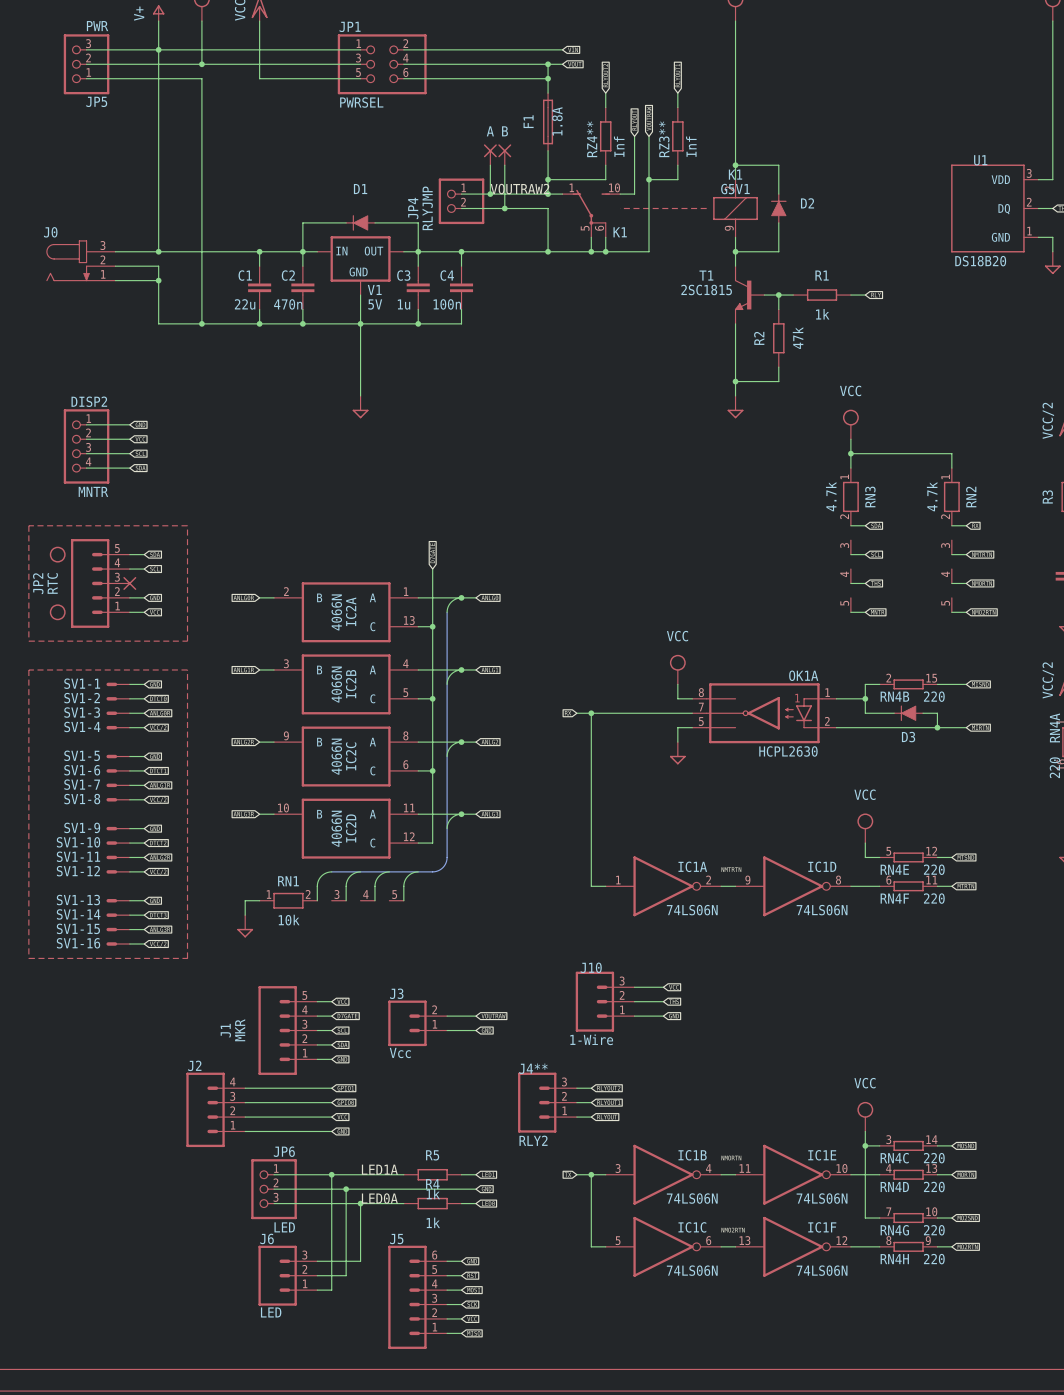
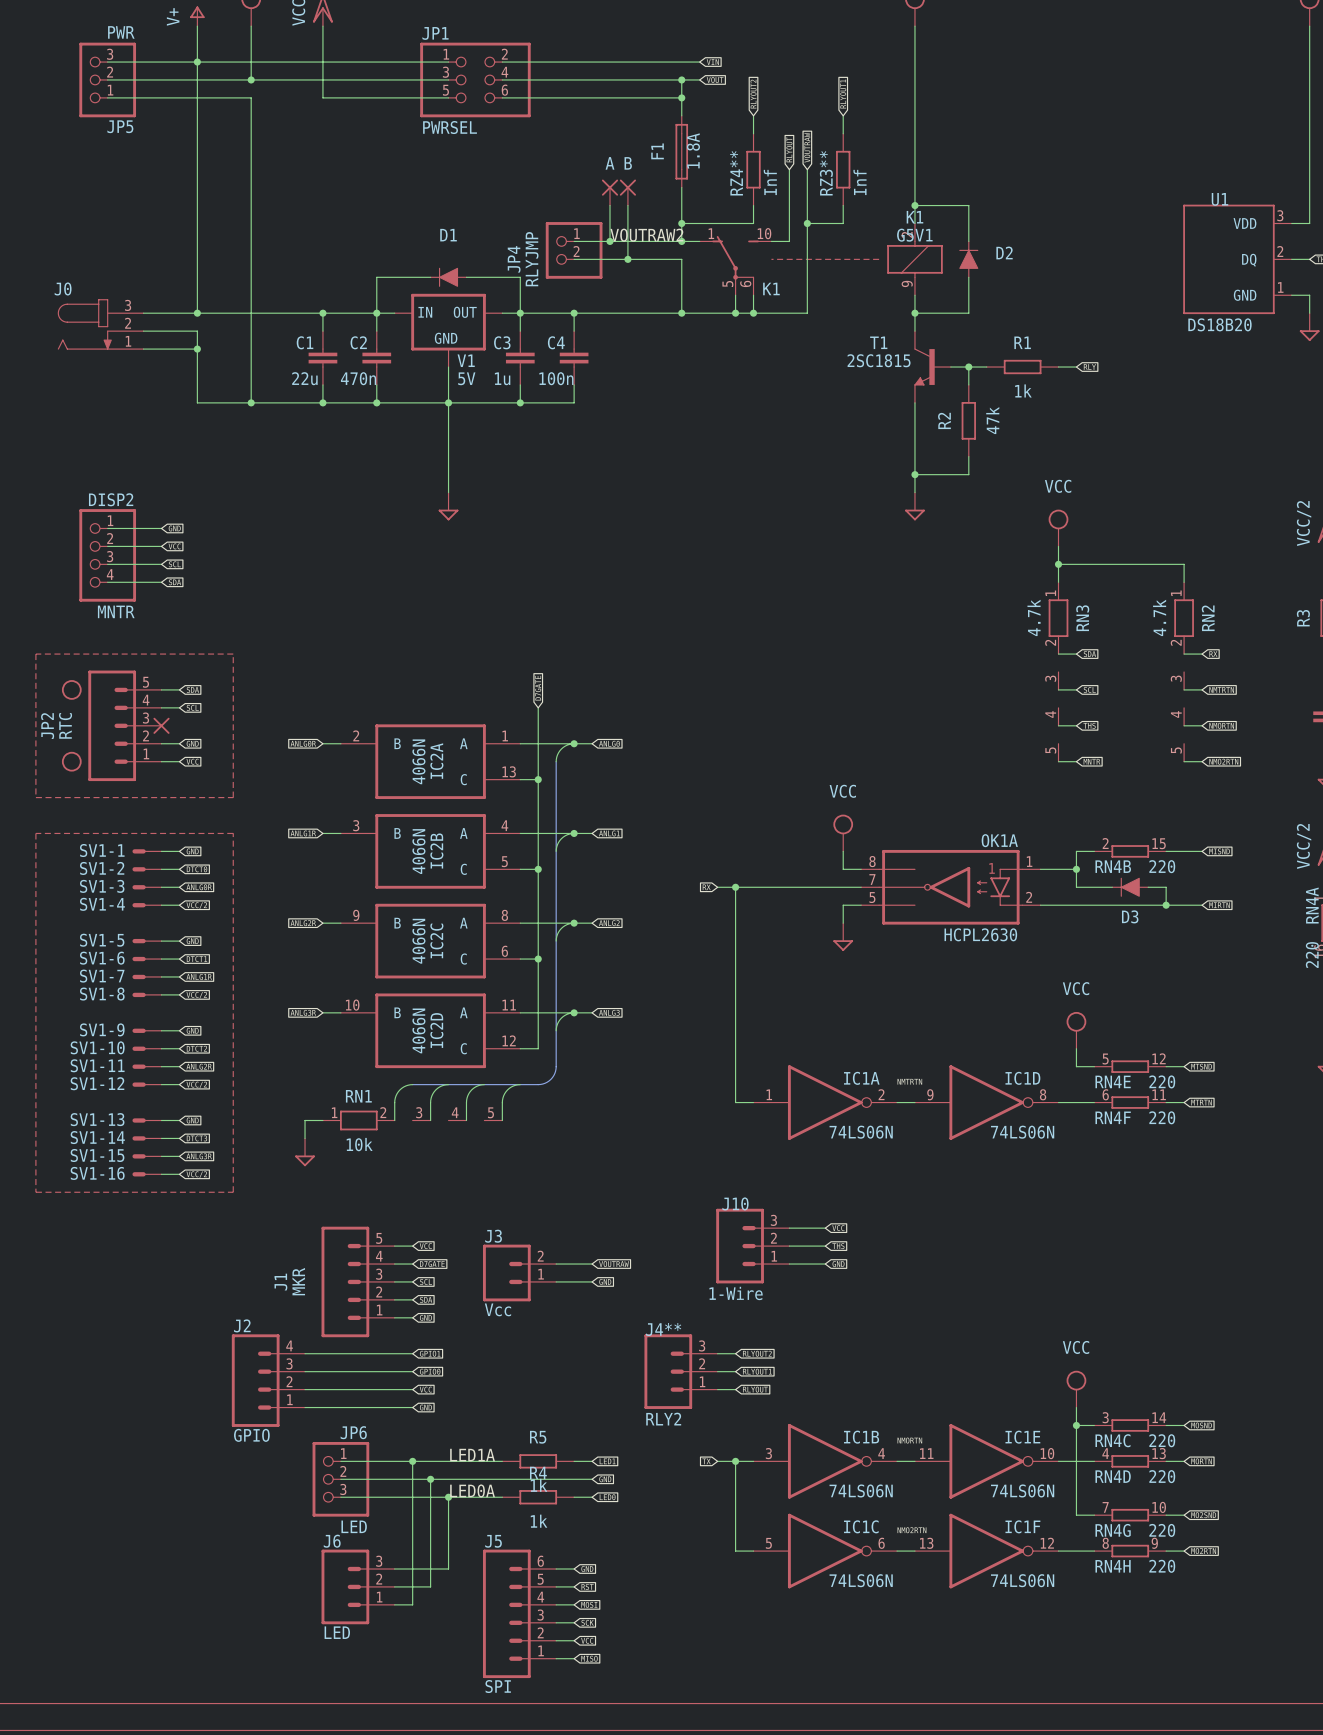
J2 value: none -> GPIO (251, 1435)
J5 value: none -> SPI (498, 1686)

